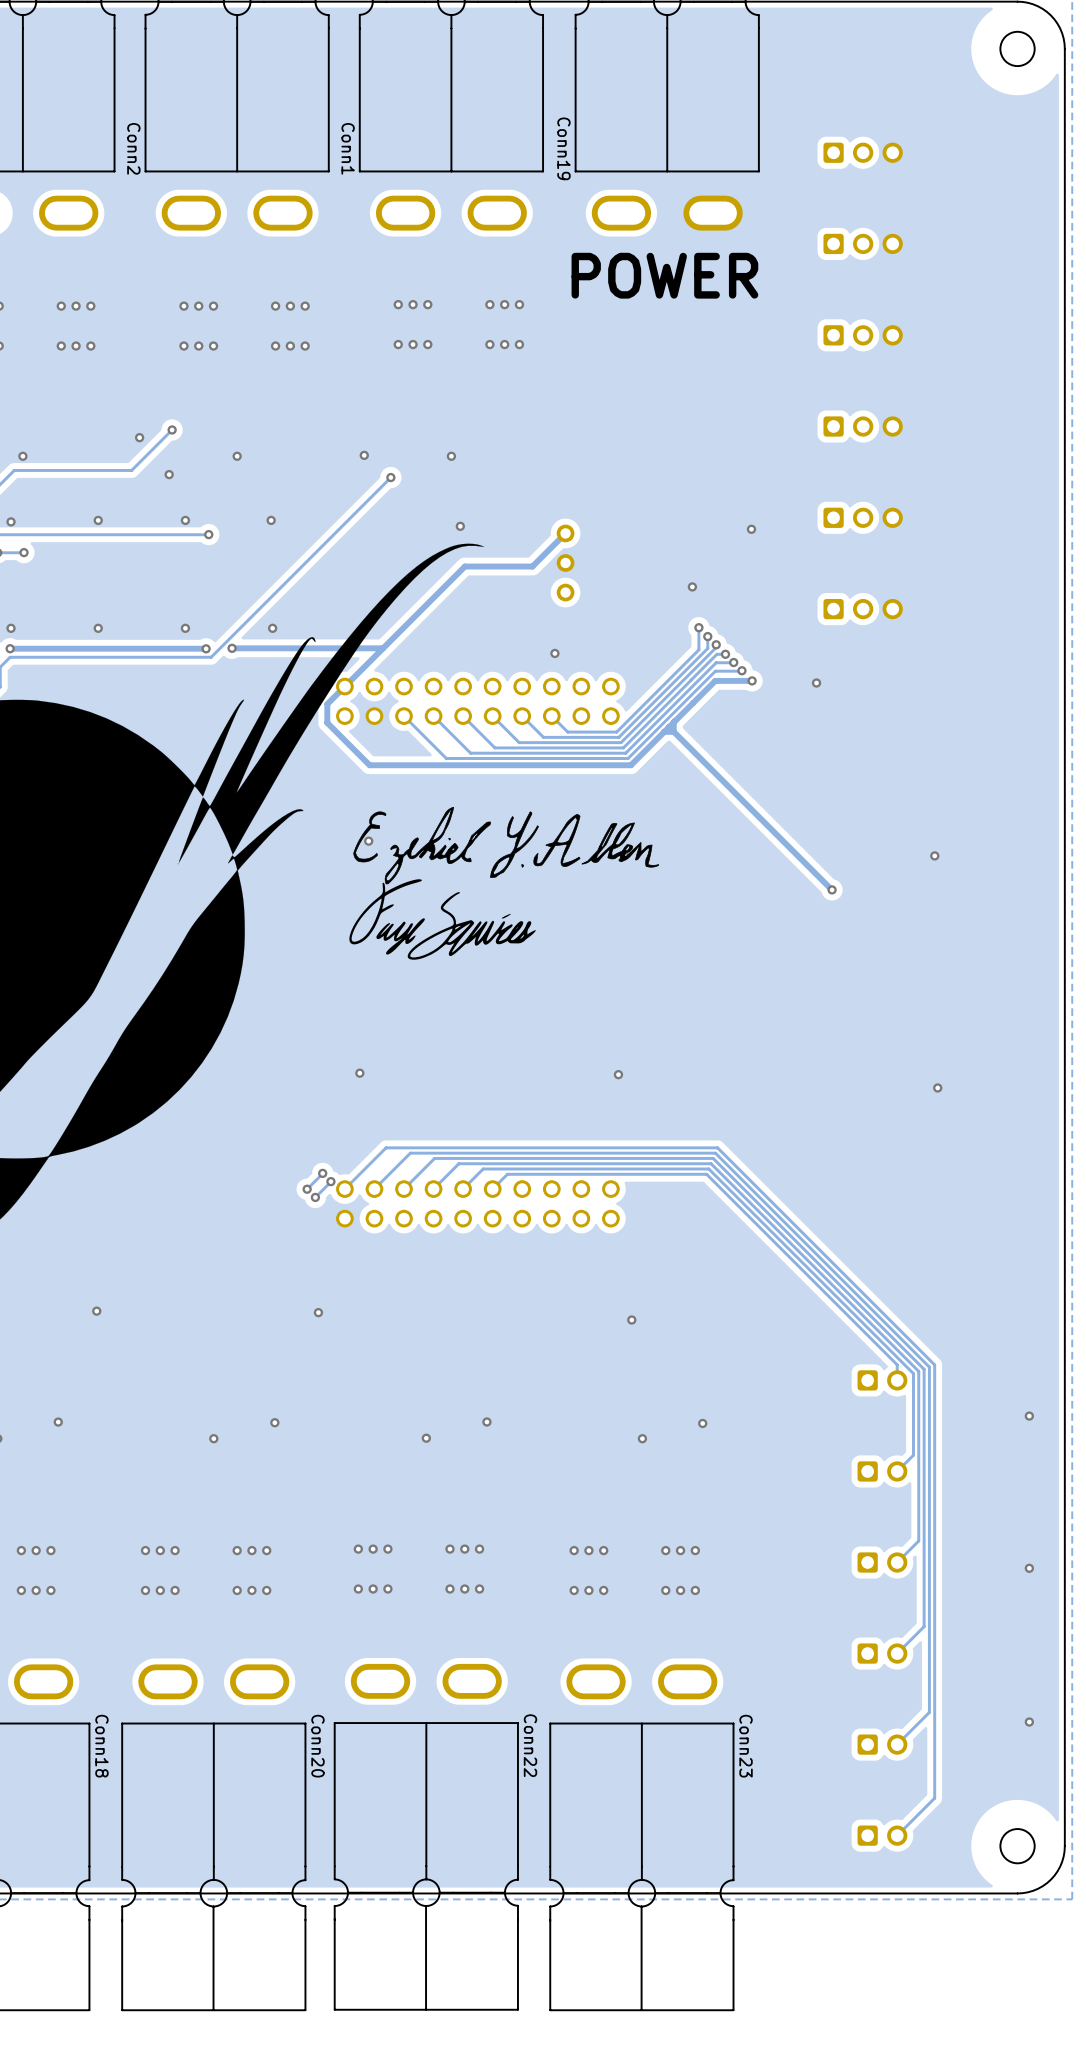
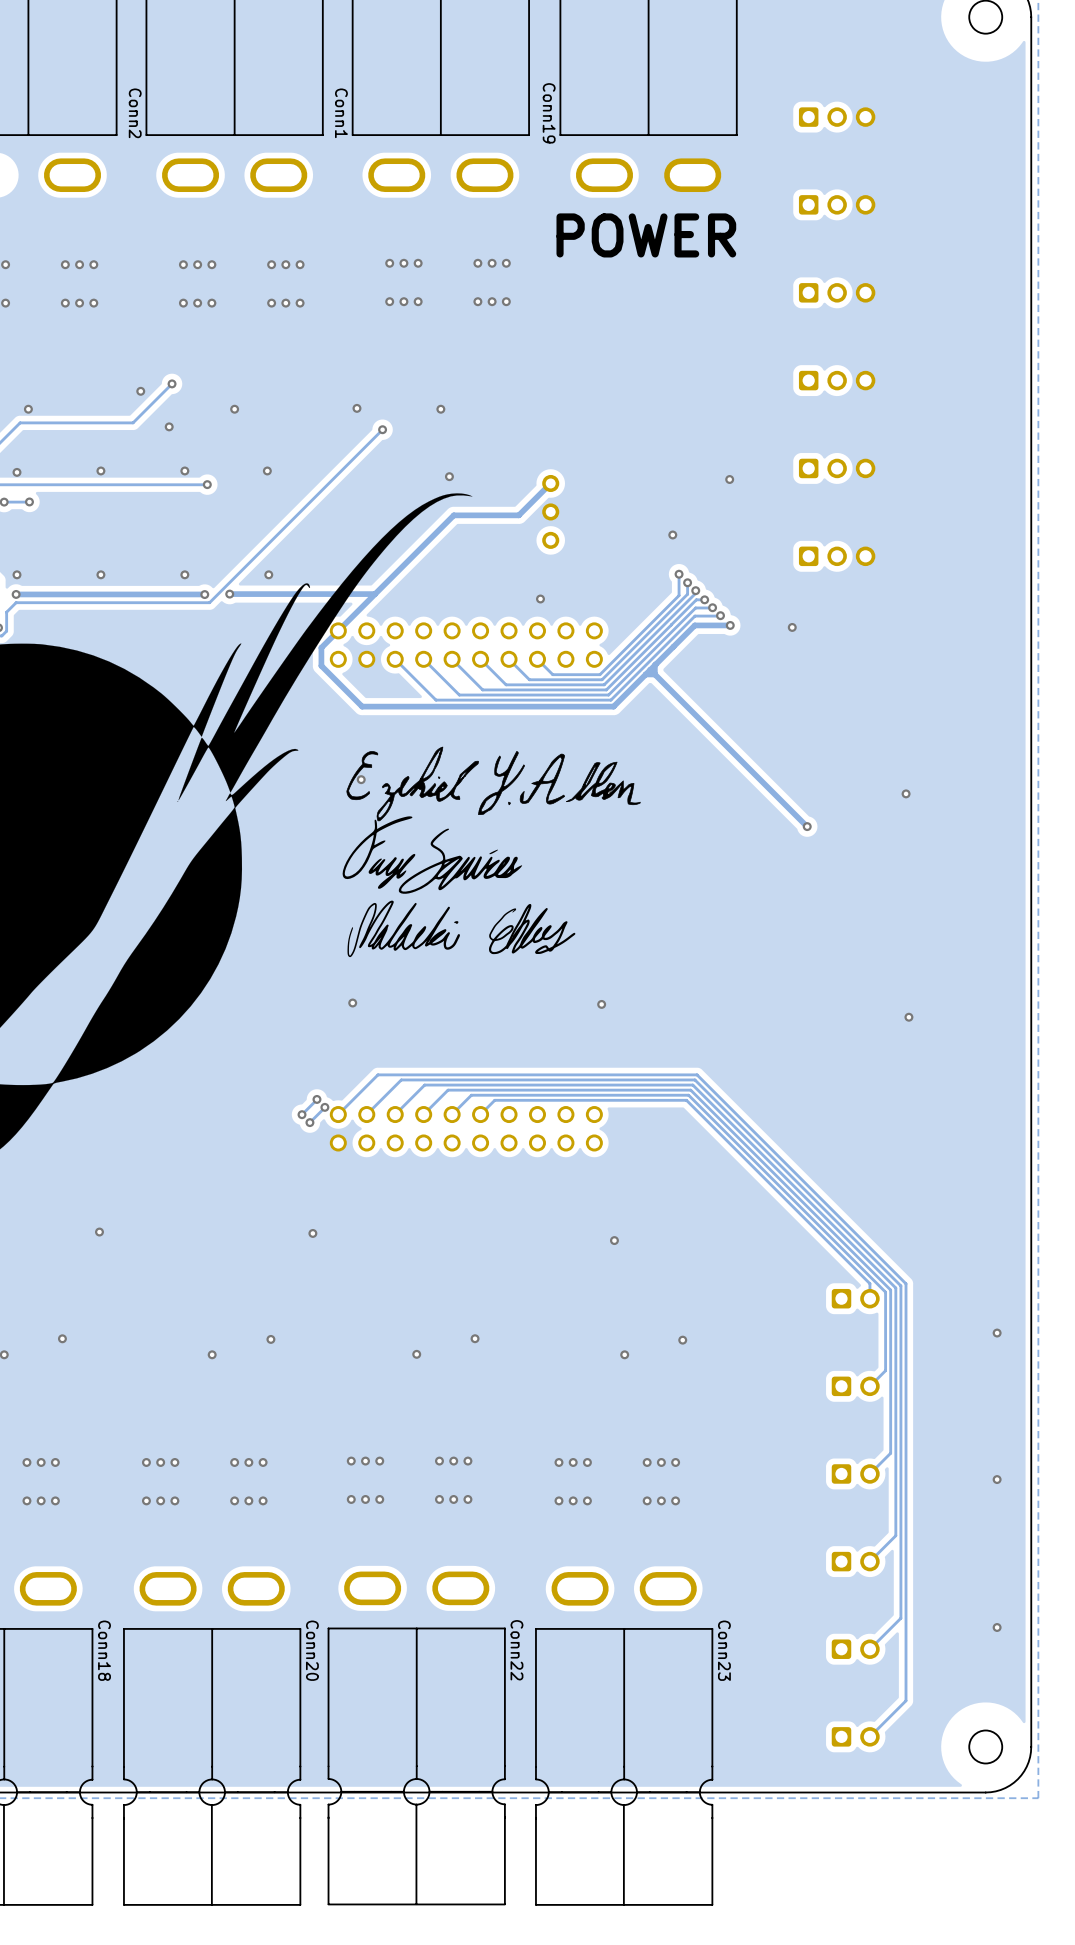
drawing: none -> [347, 900, 576, 958]

